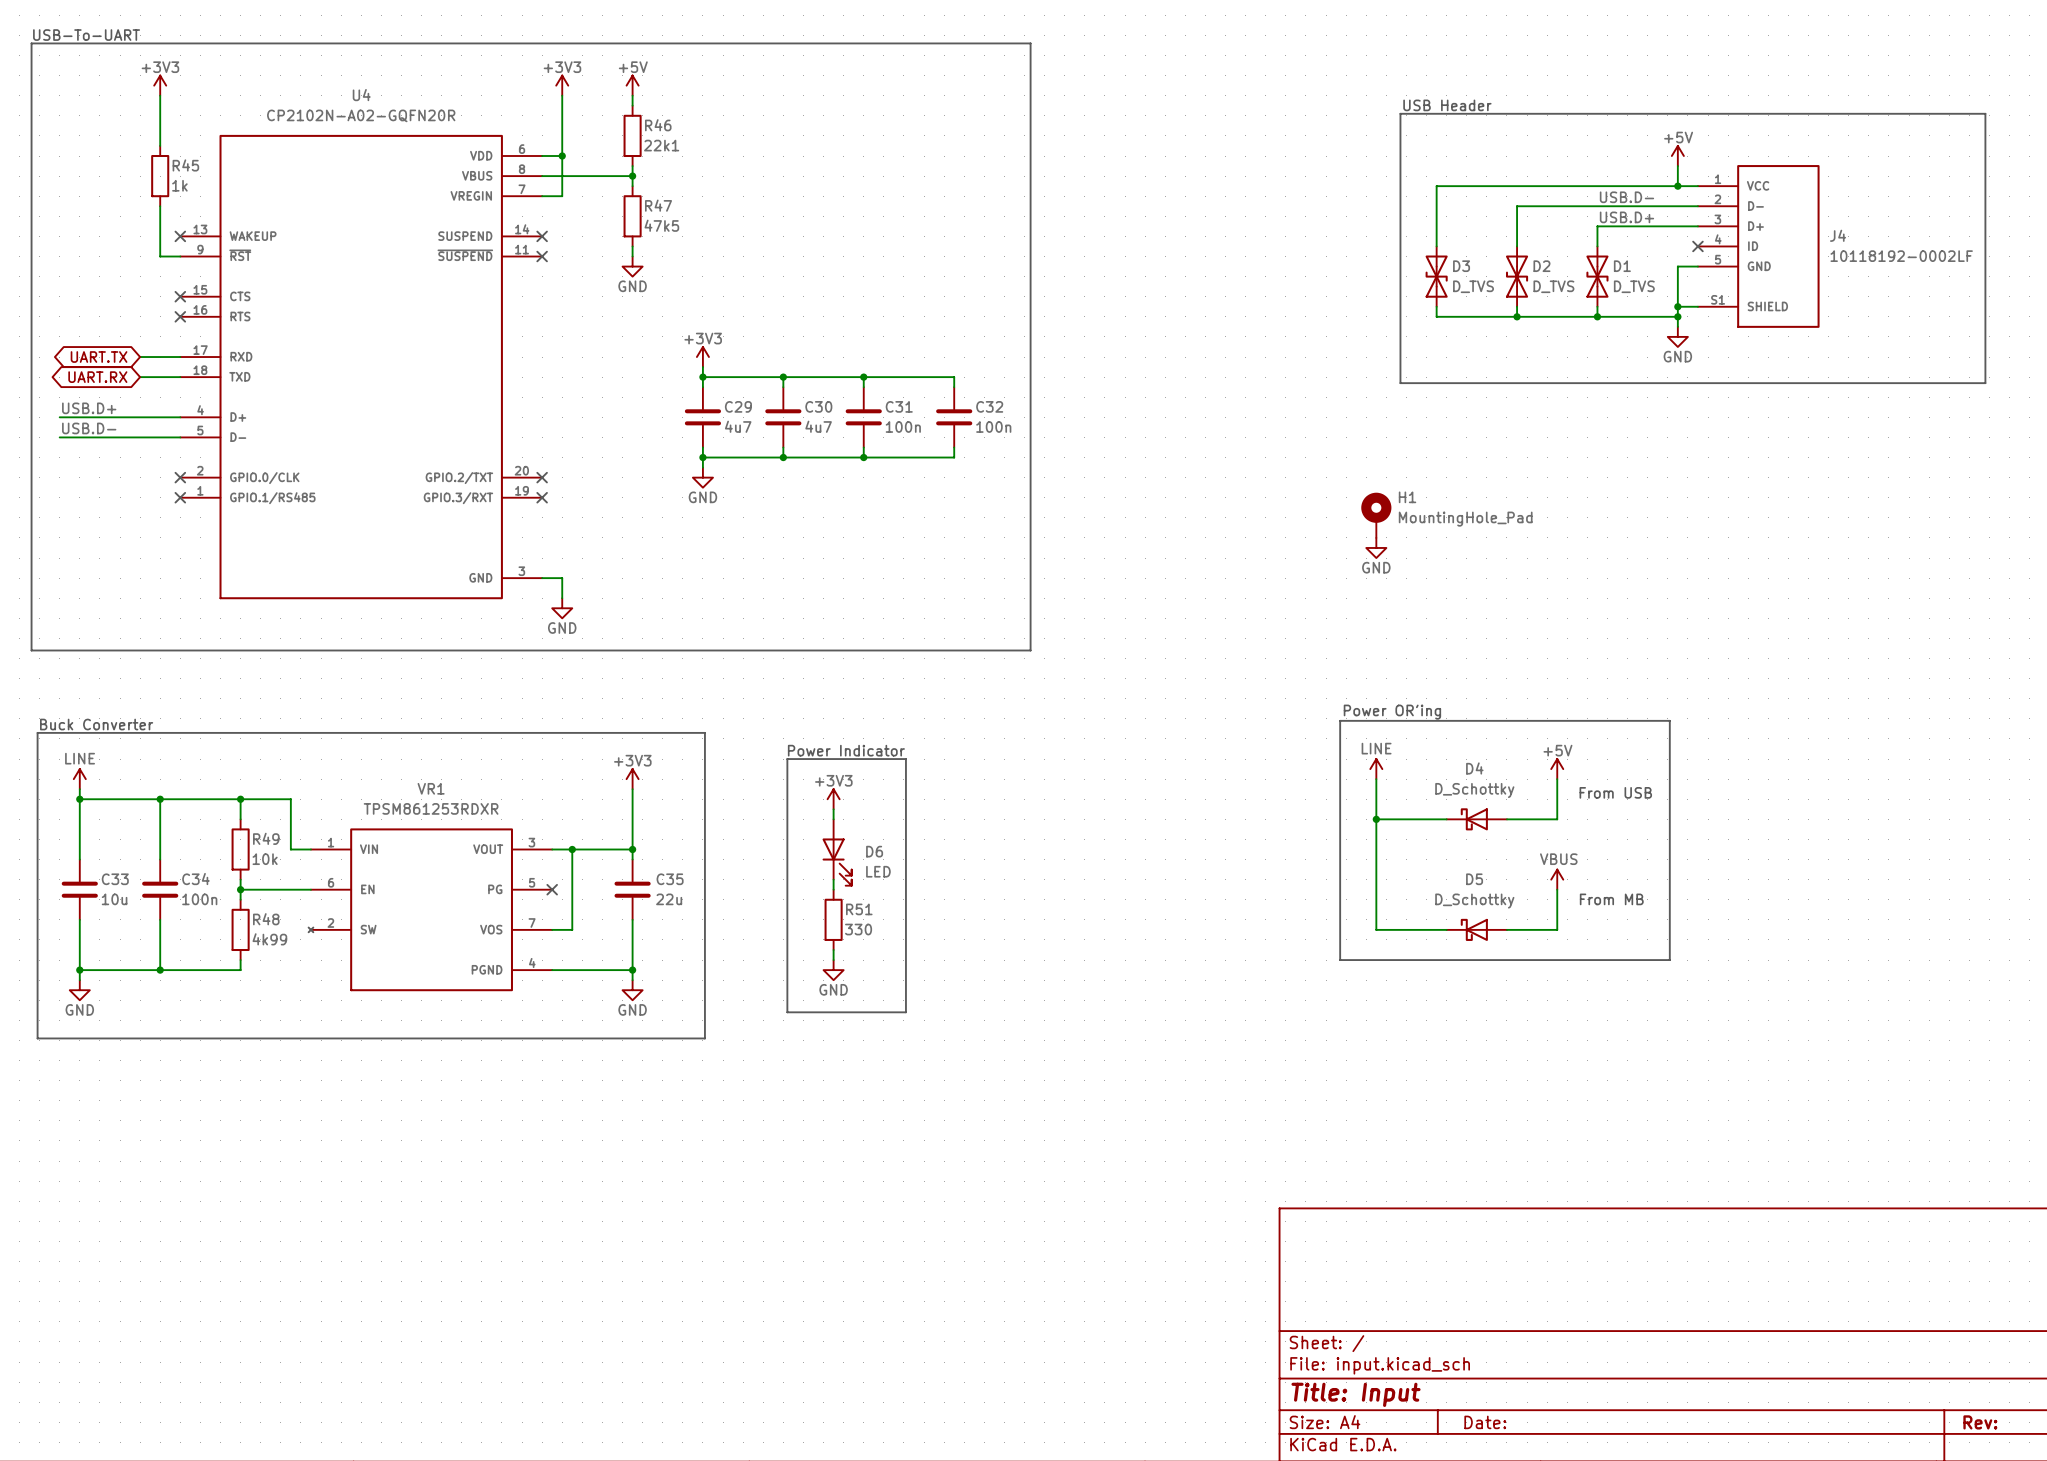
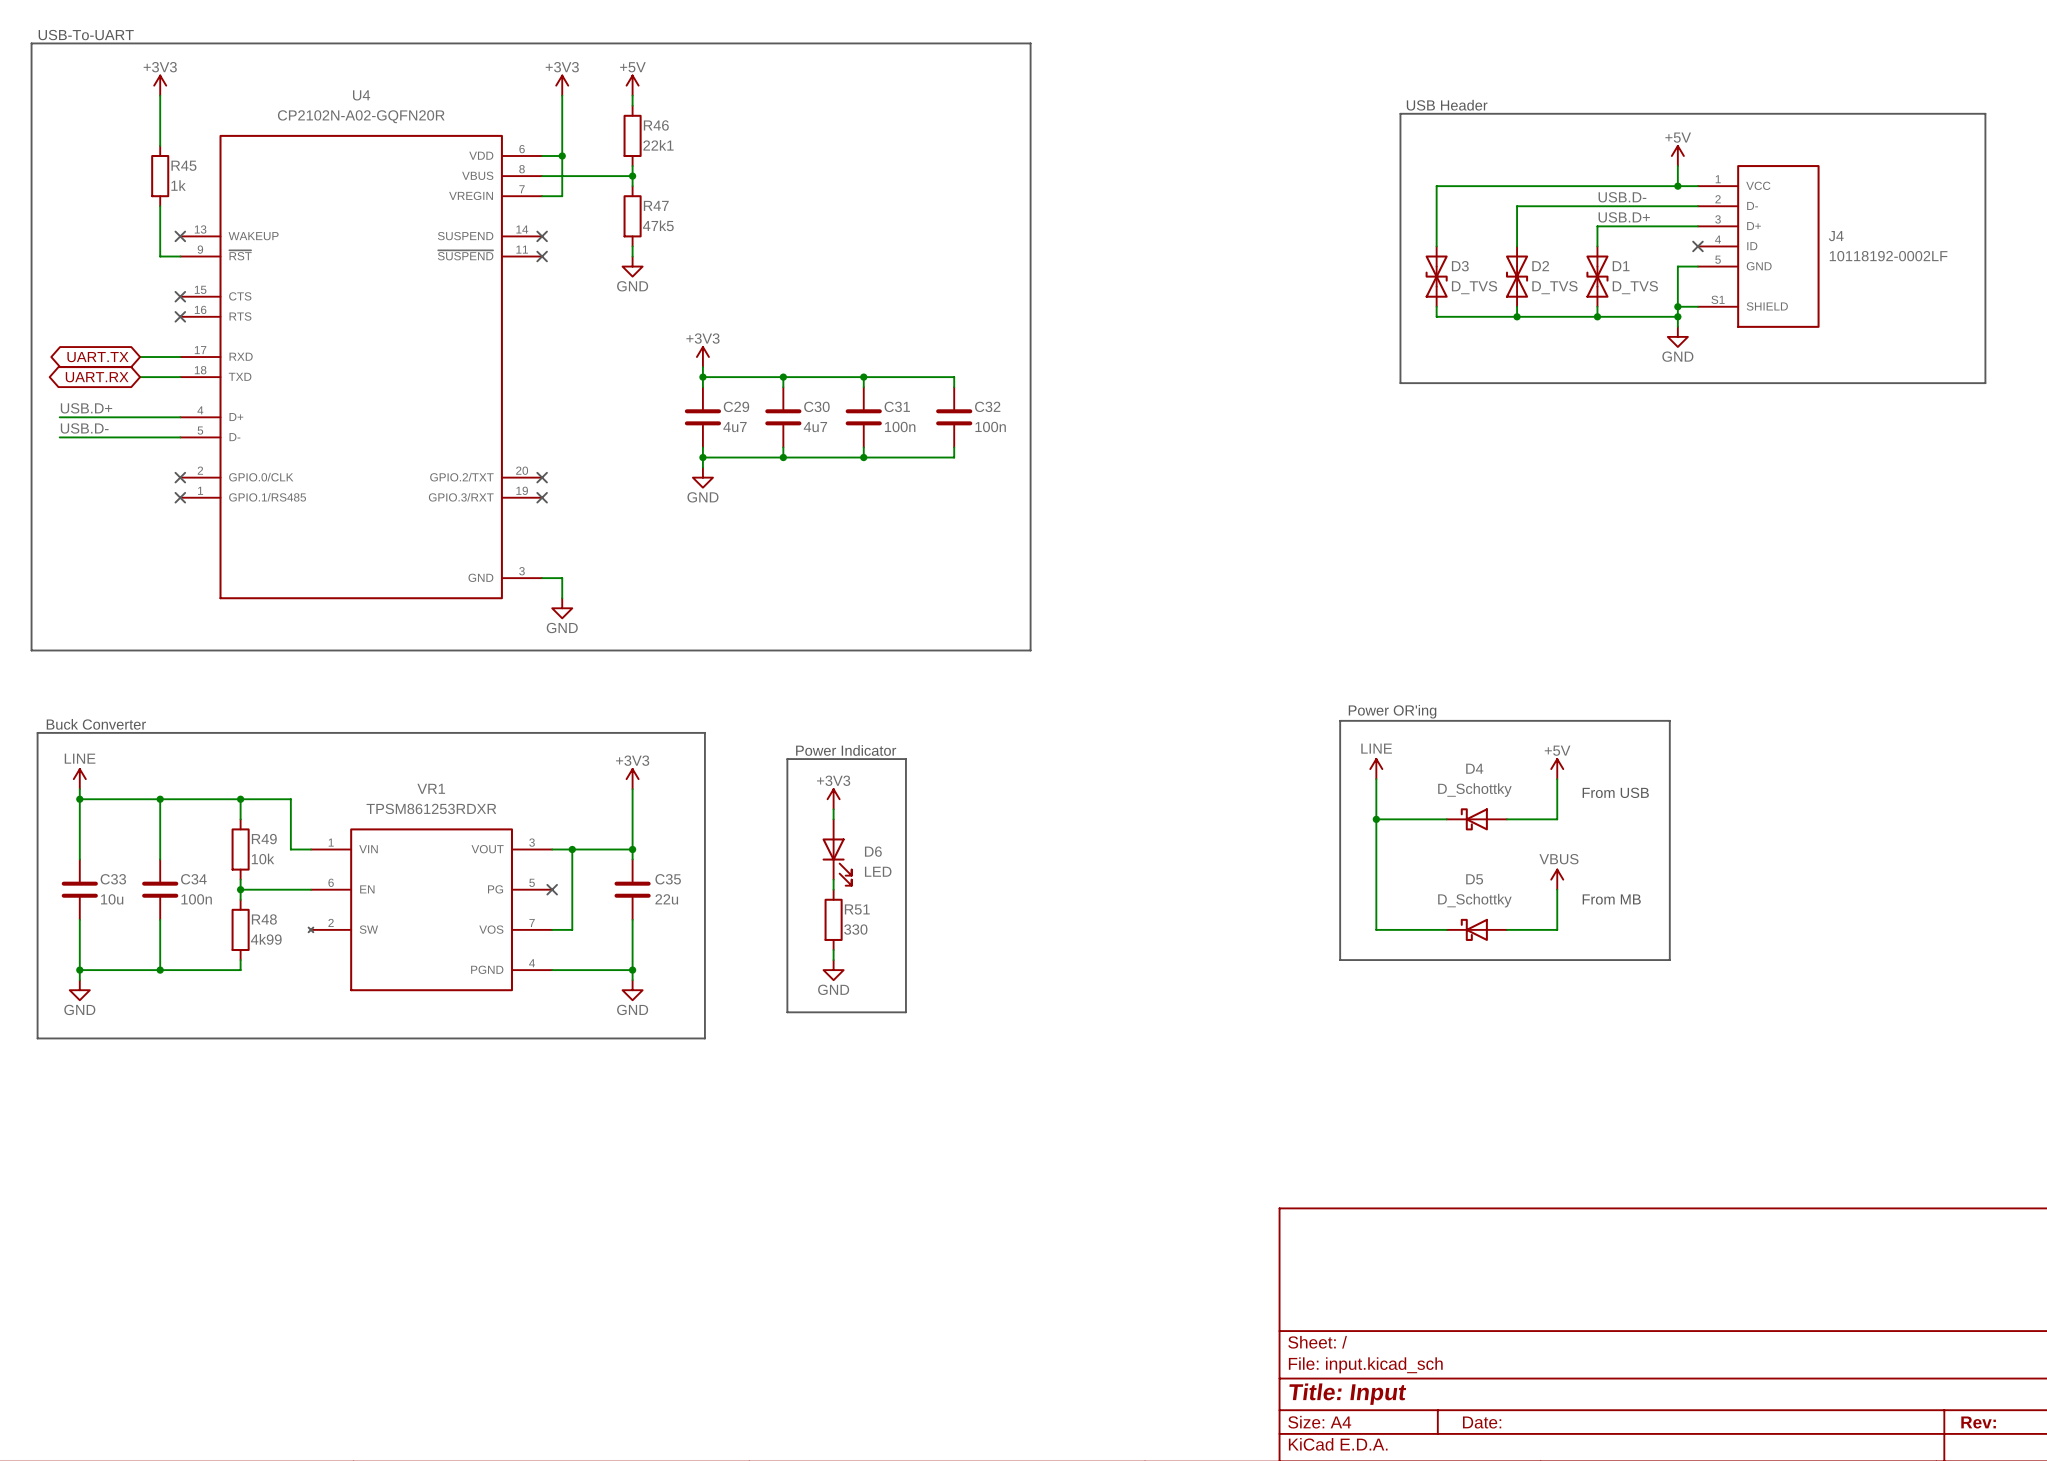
H1: MountingHole_Pad (1376, 515) -> none
power symbol: GND (1376, 547) -> none

